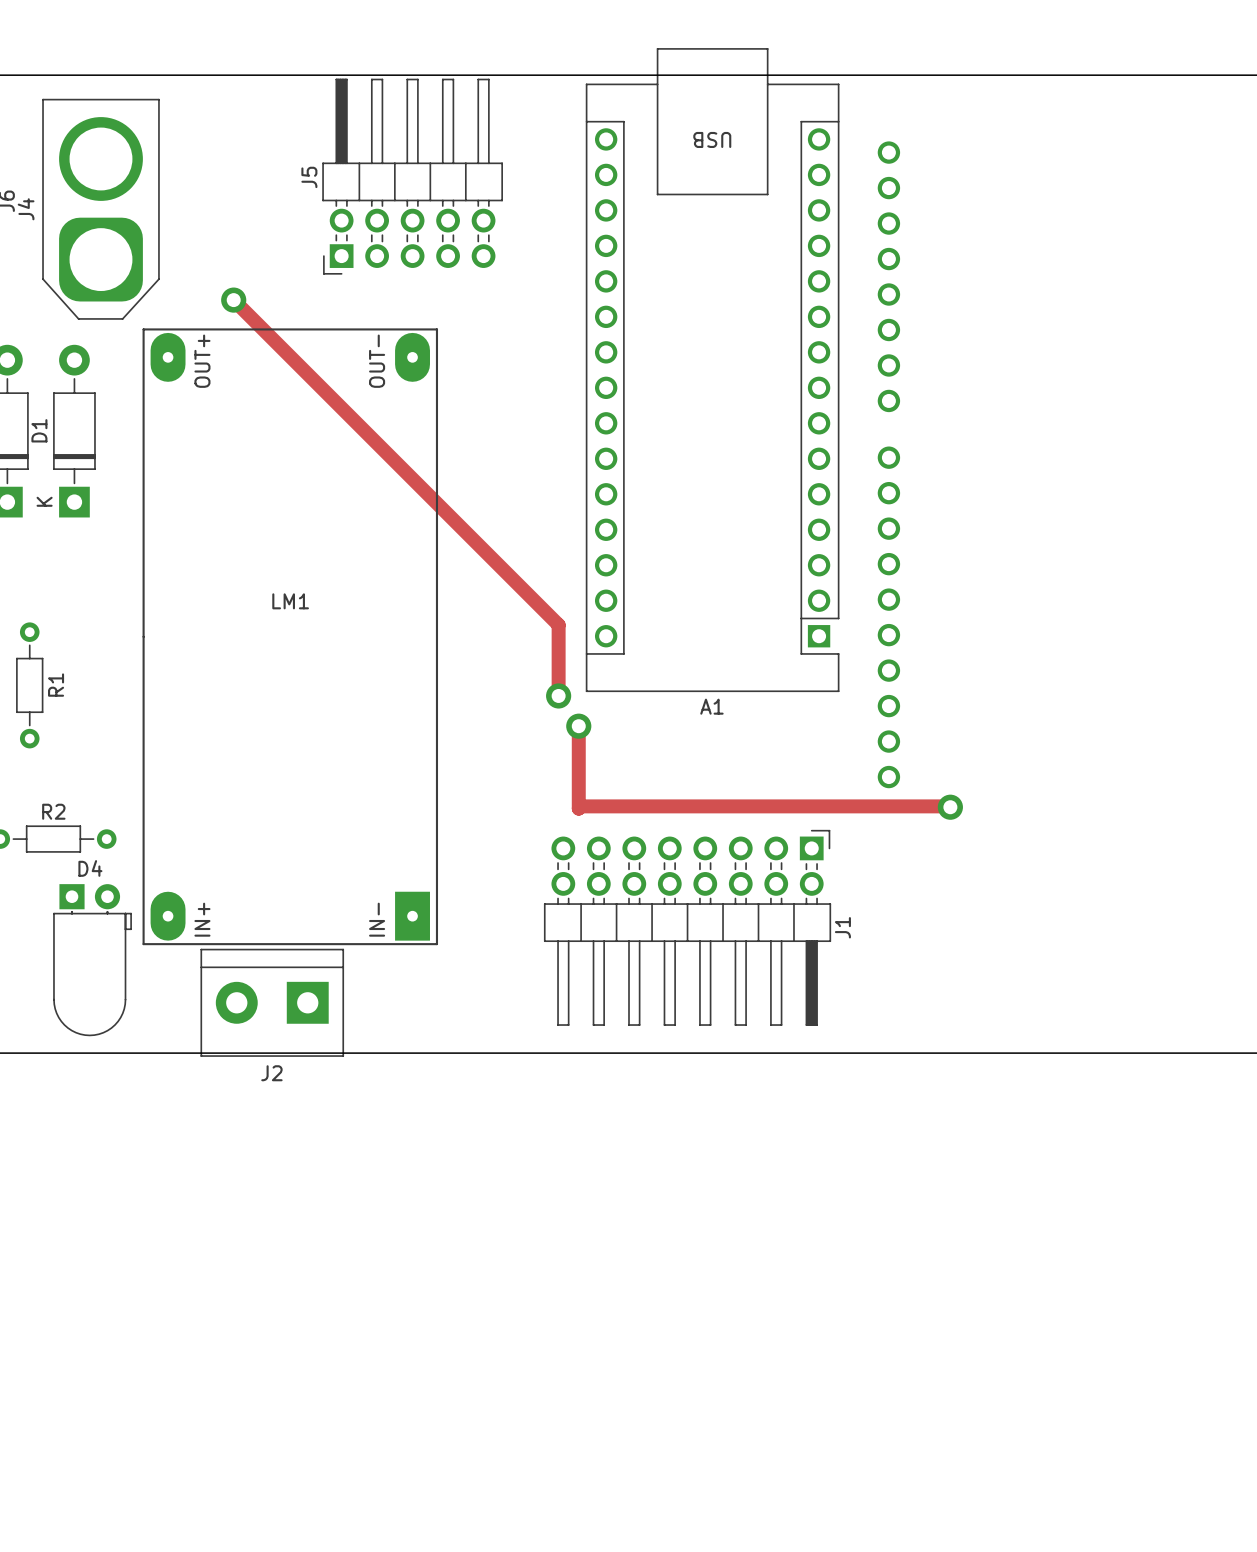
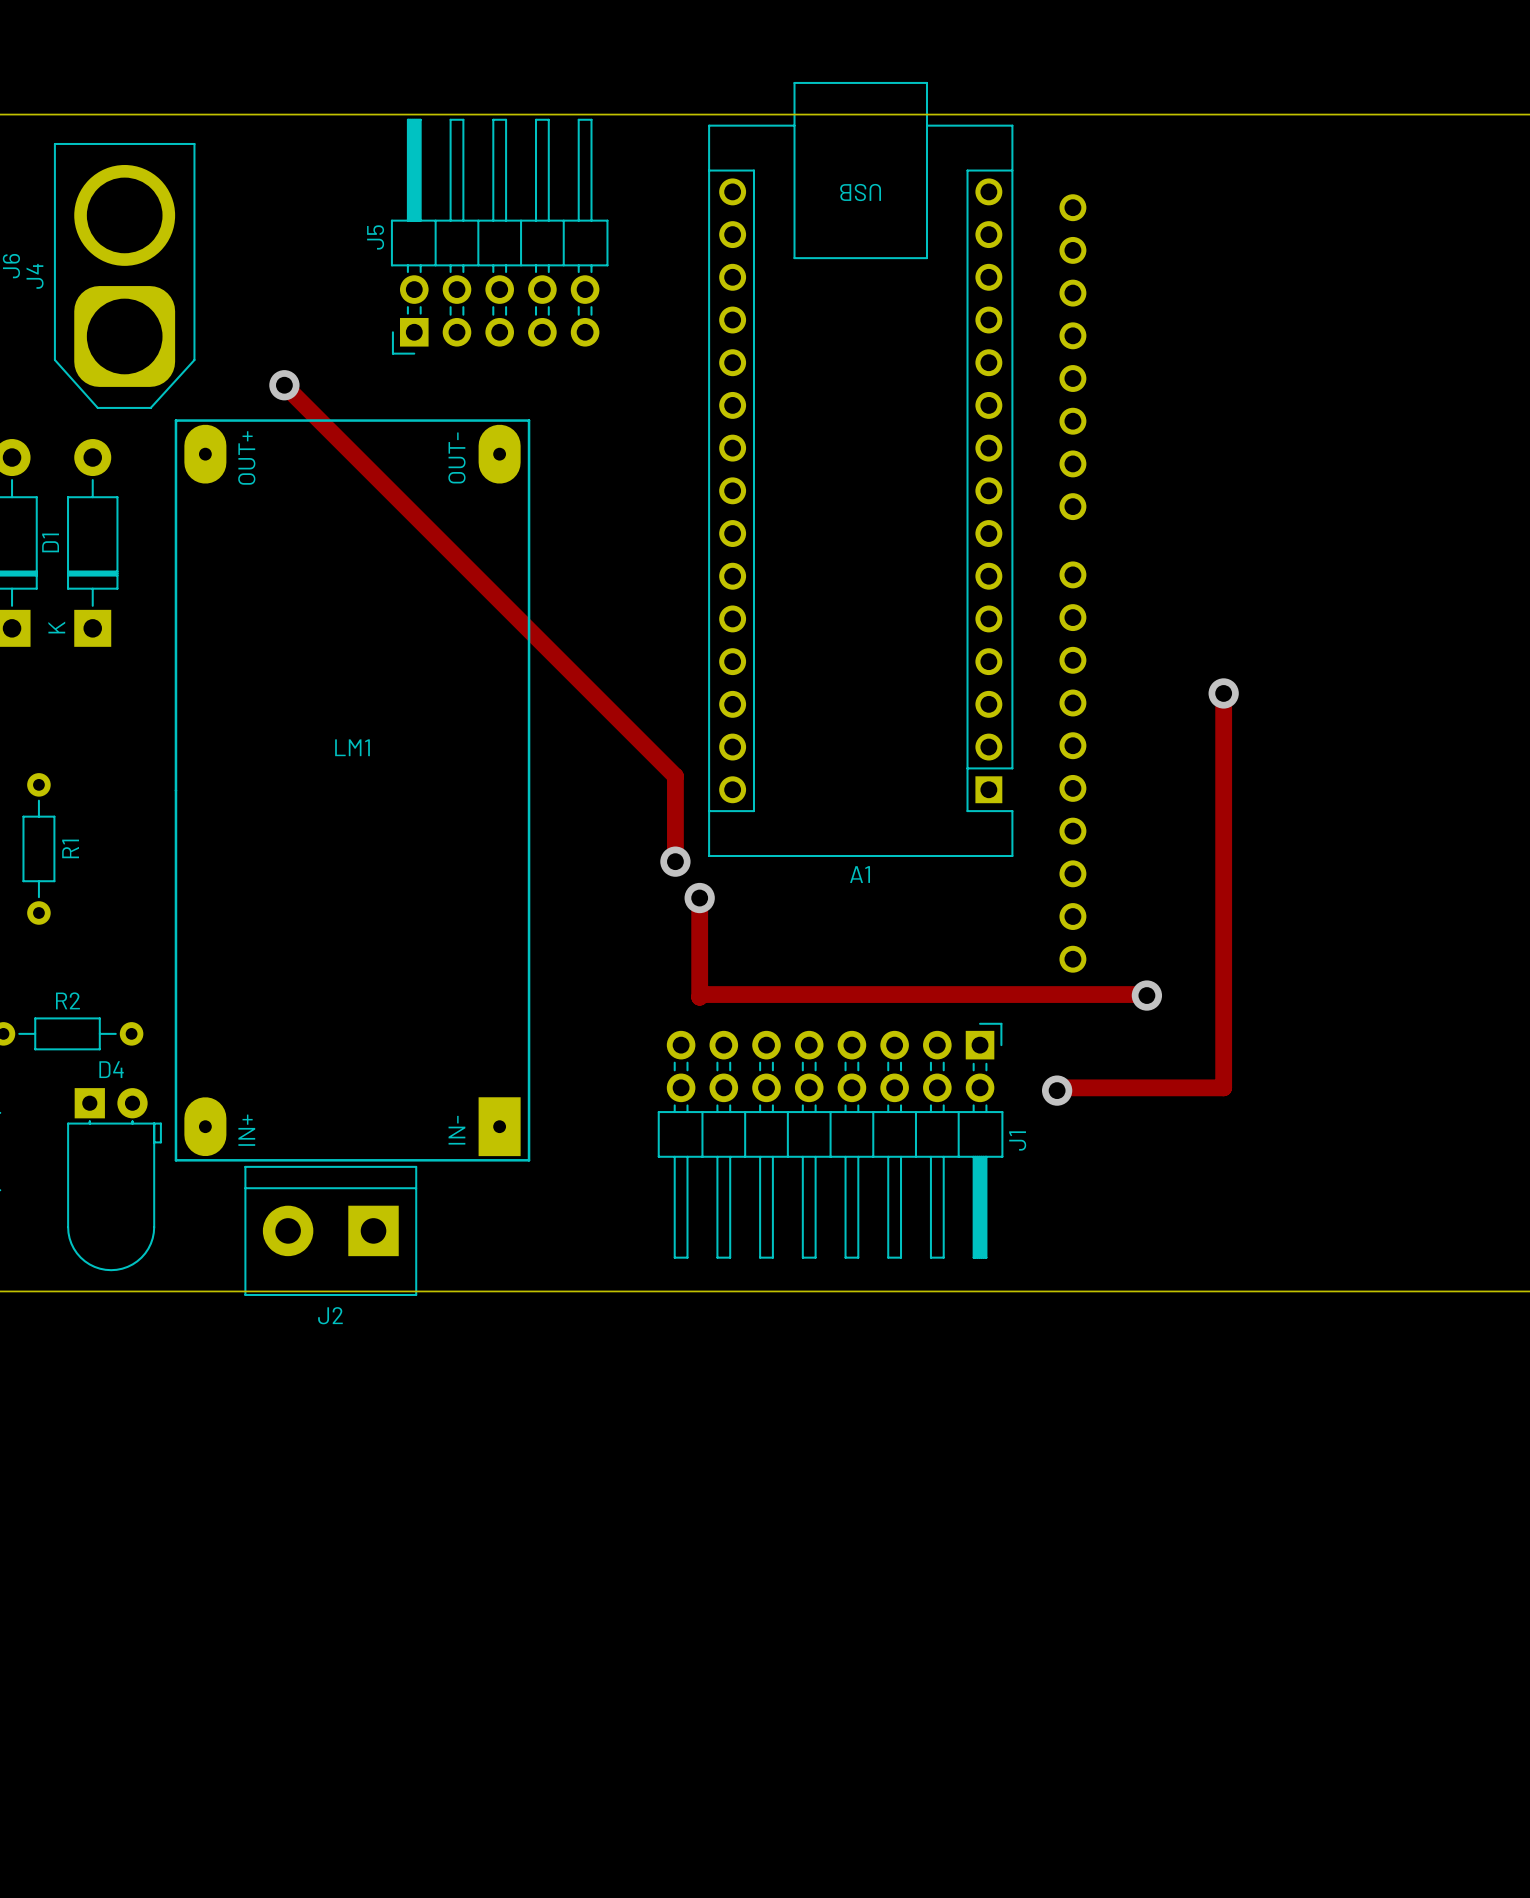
track: none -> (1223, 693) (1223, 1087) (1059, 1087) (1057, 1090)
via: none -> (1223, 693)
via: none -> (1057, 1090)

